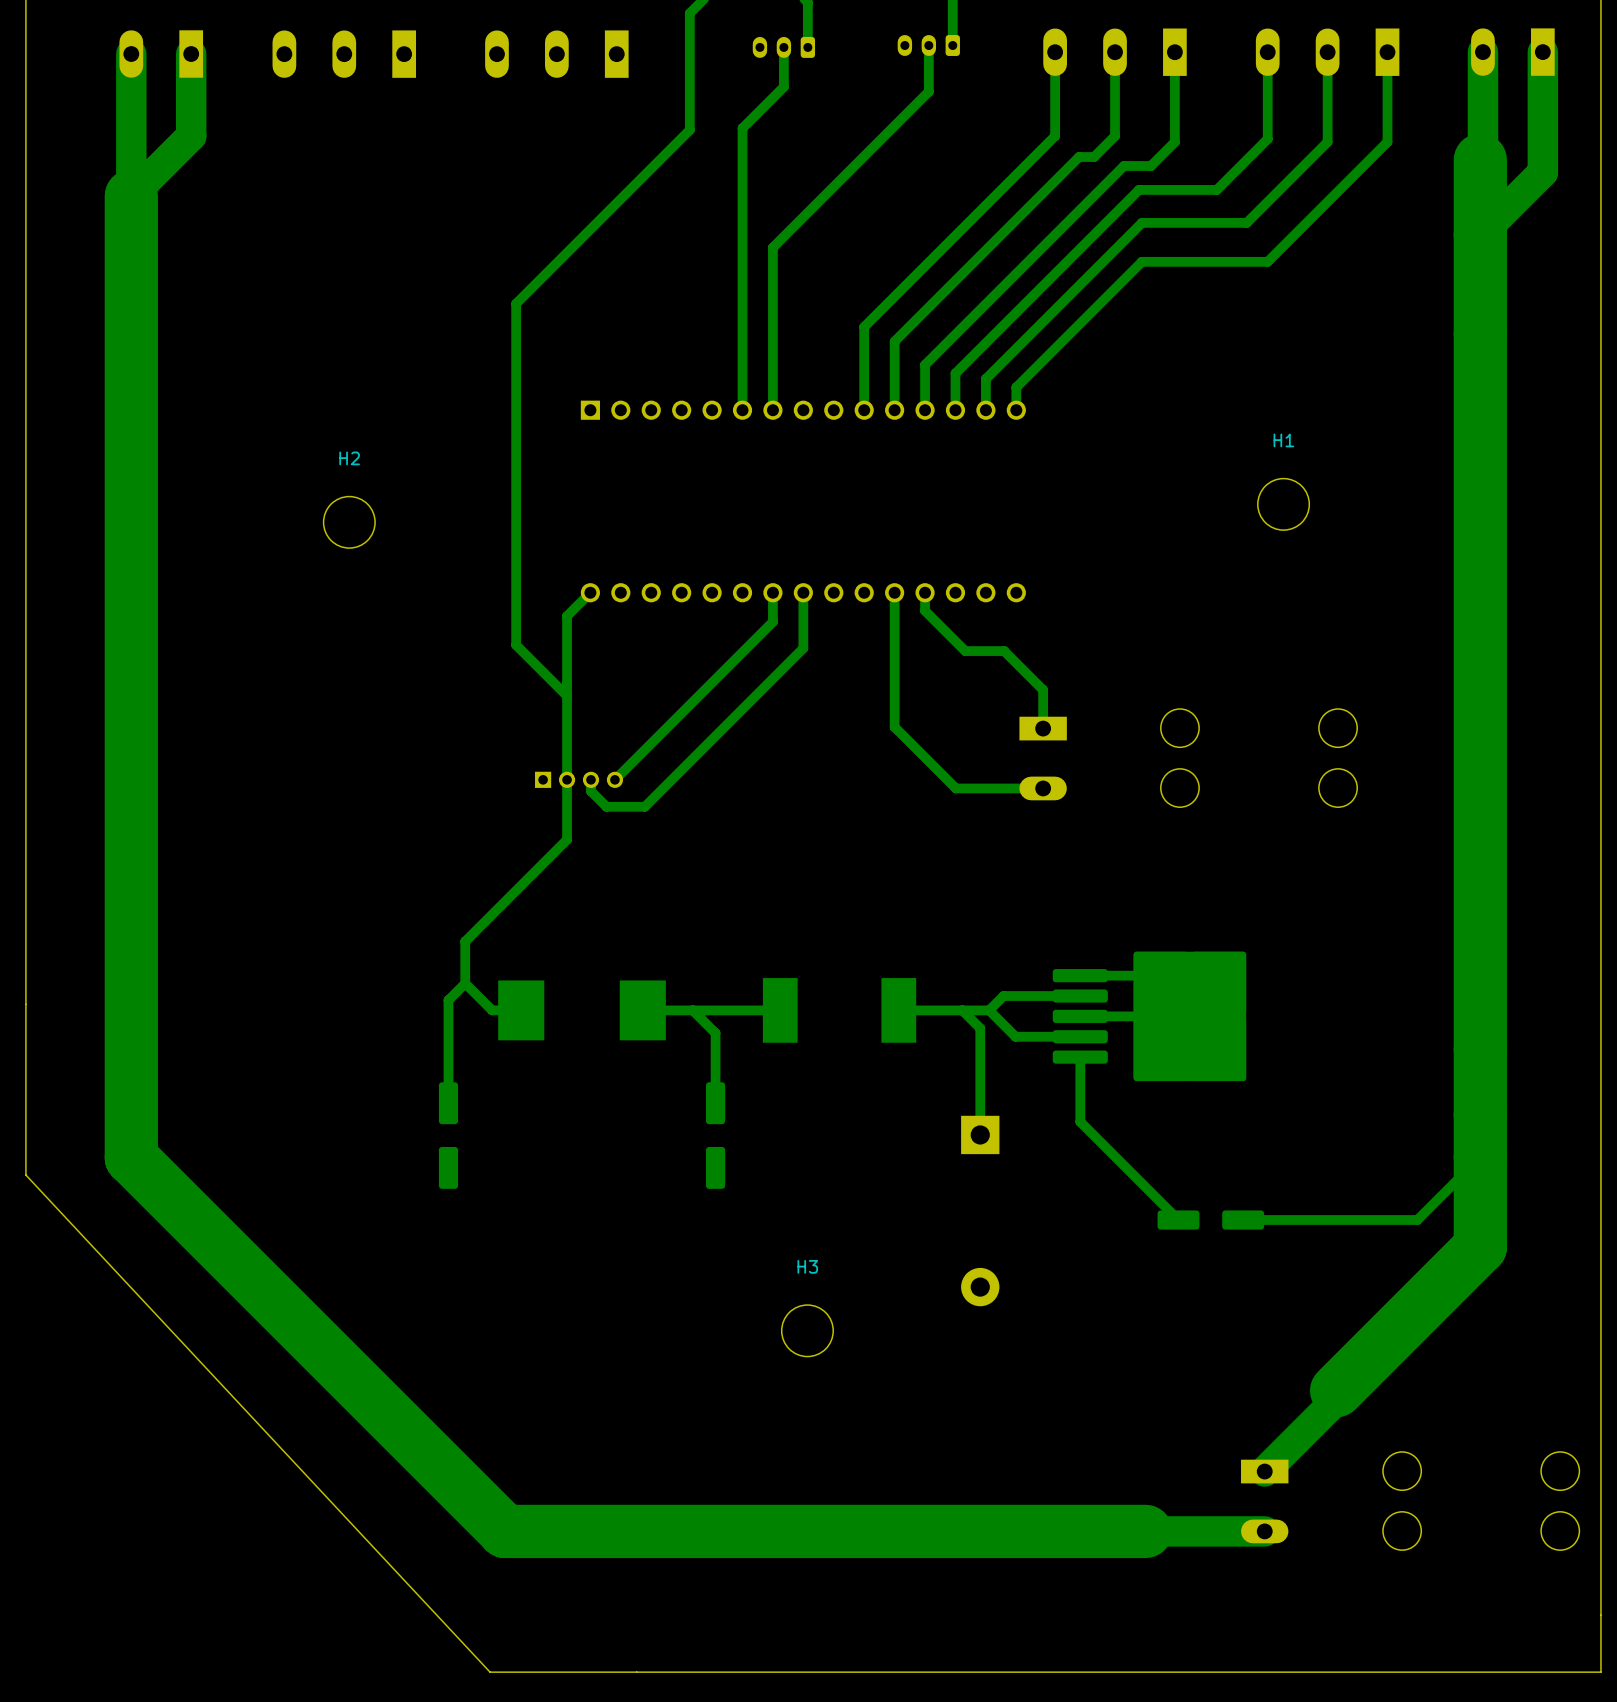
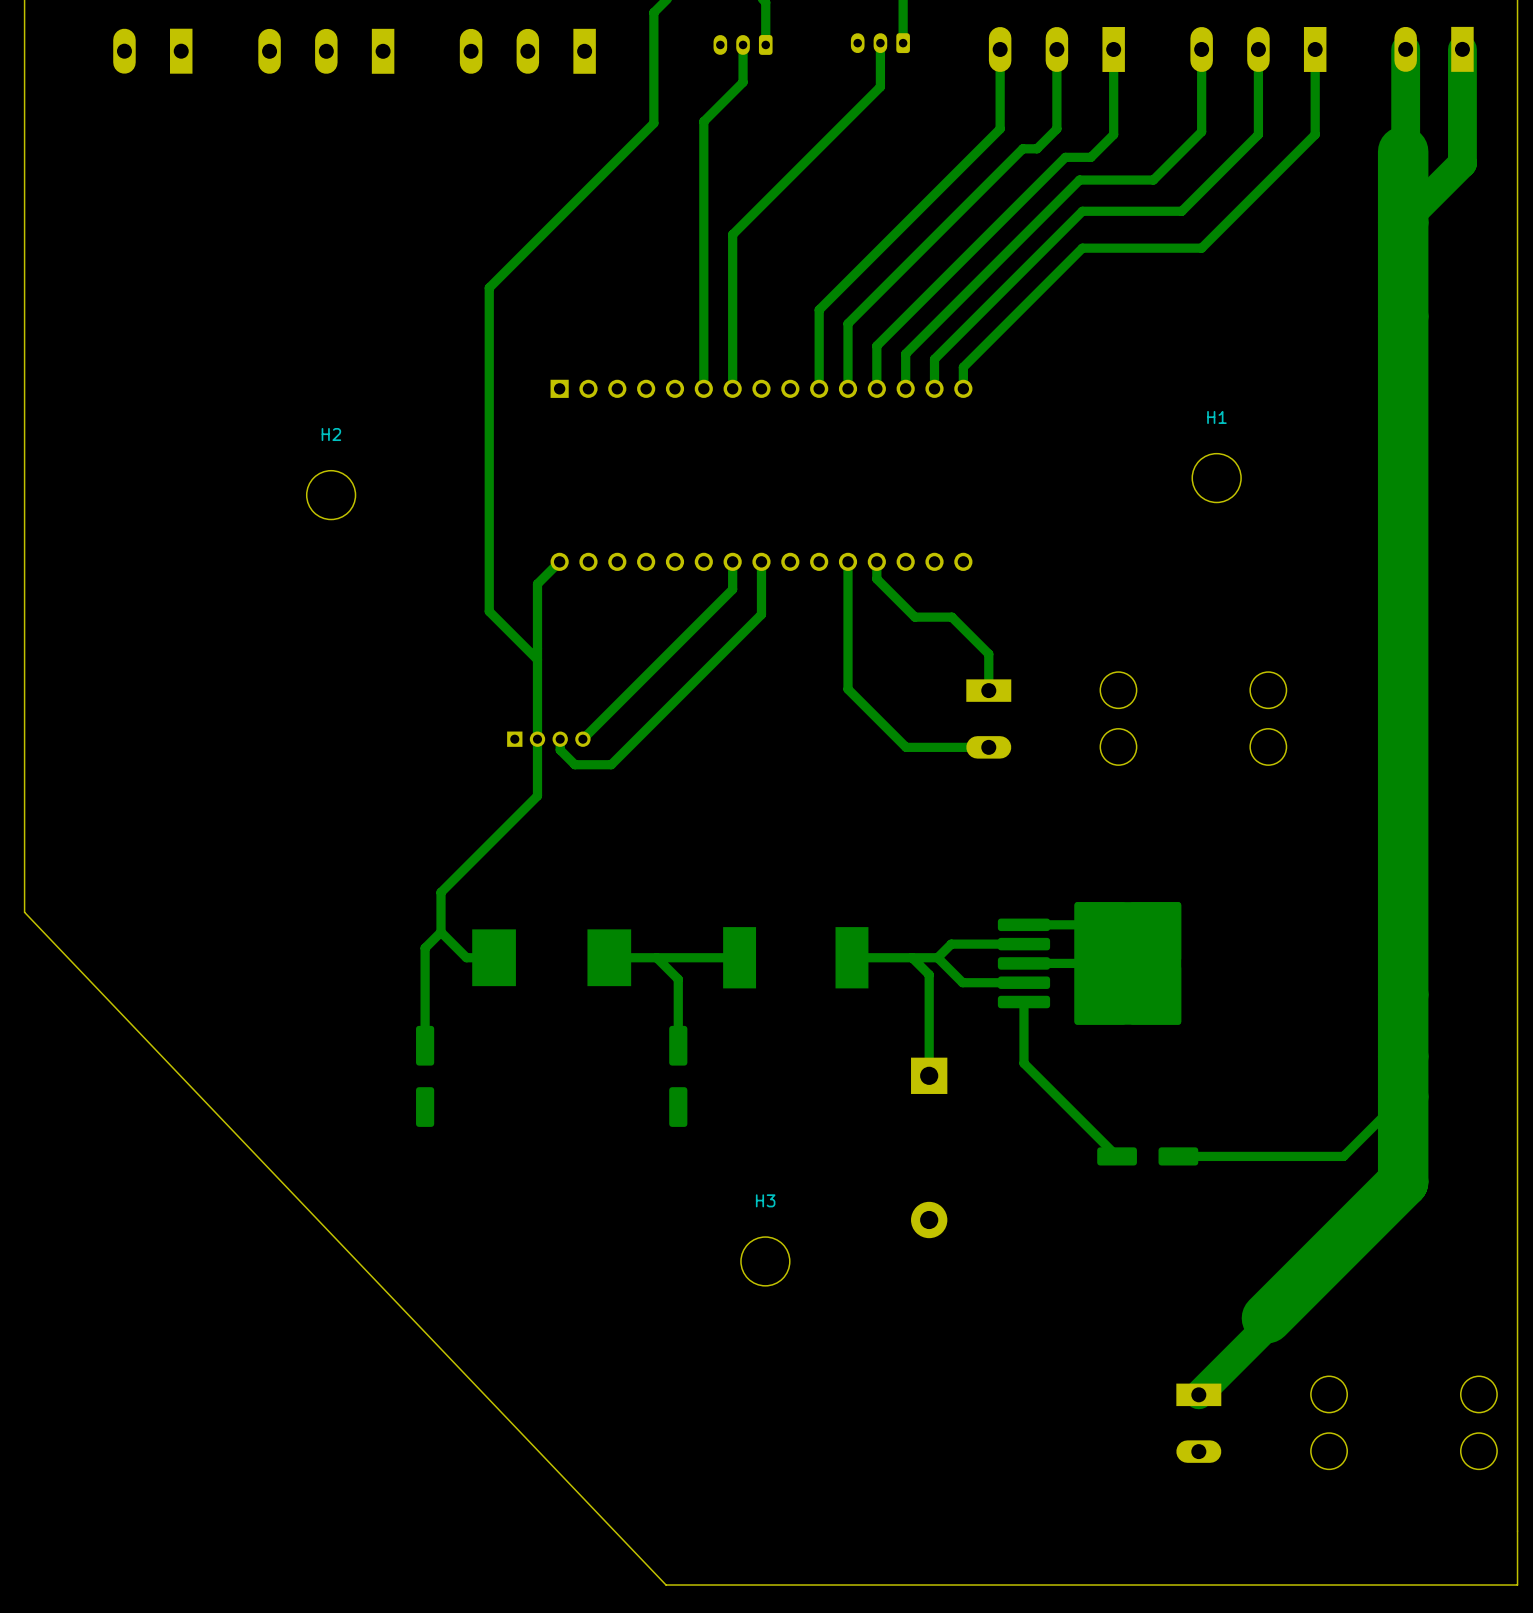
bottom track: (131, 54) (131, 195) -> none
bottom track: (191, 54) (191, 136) (131, 195) -> none
bottom track: (131, 195) (131, 1157) (505, 1531) (1264, 1531) -> none
board edge: (25, 962) (25, 1175) (490, 1672) (702, 1672) -> (24, 912) (666, 1585)

